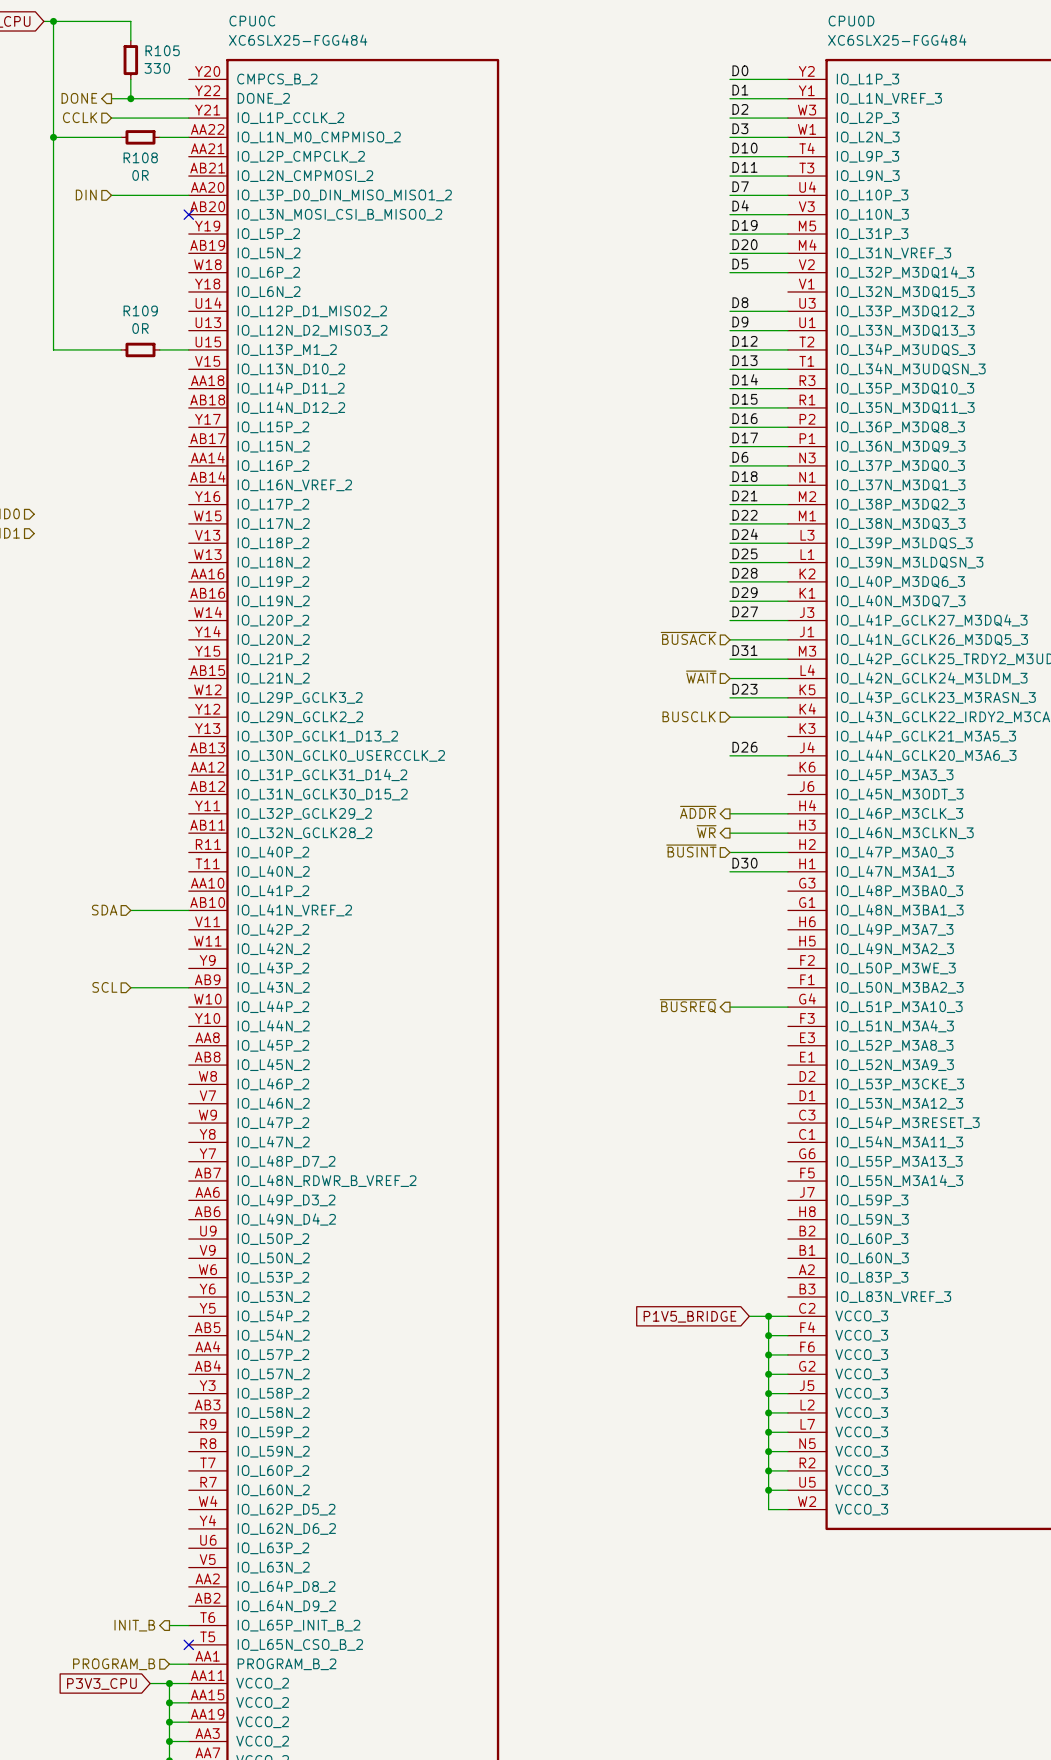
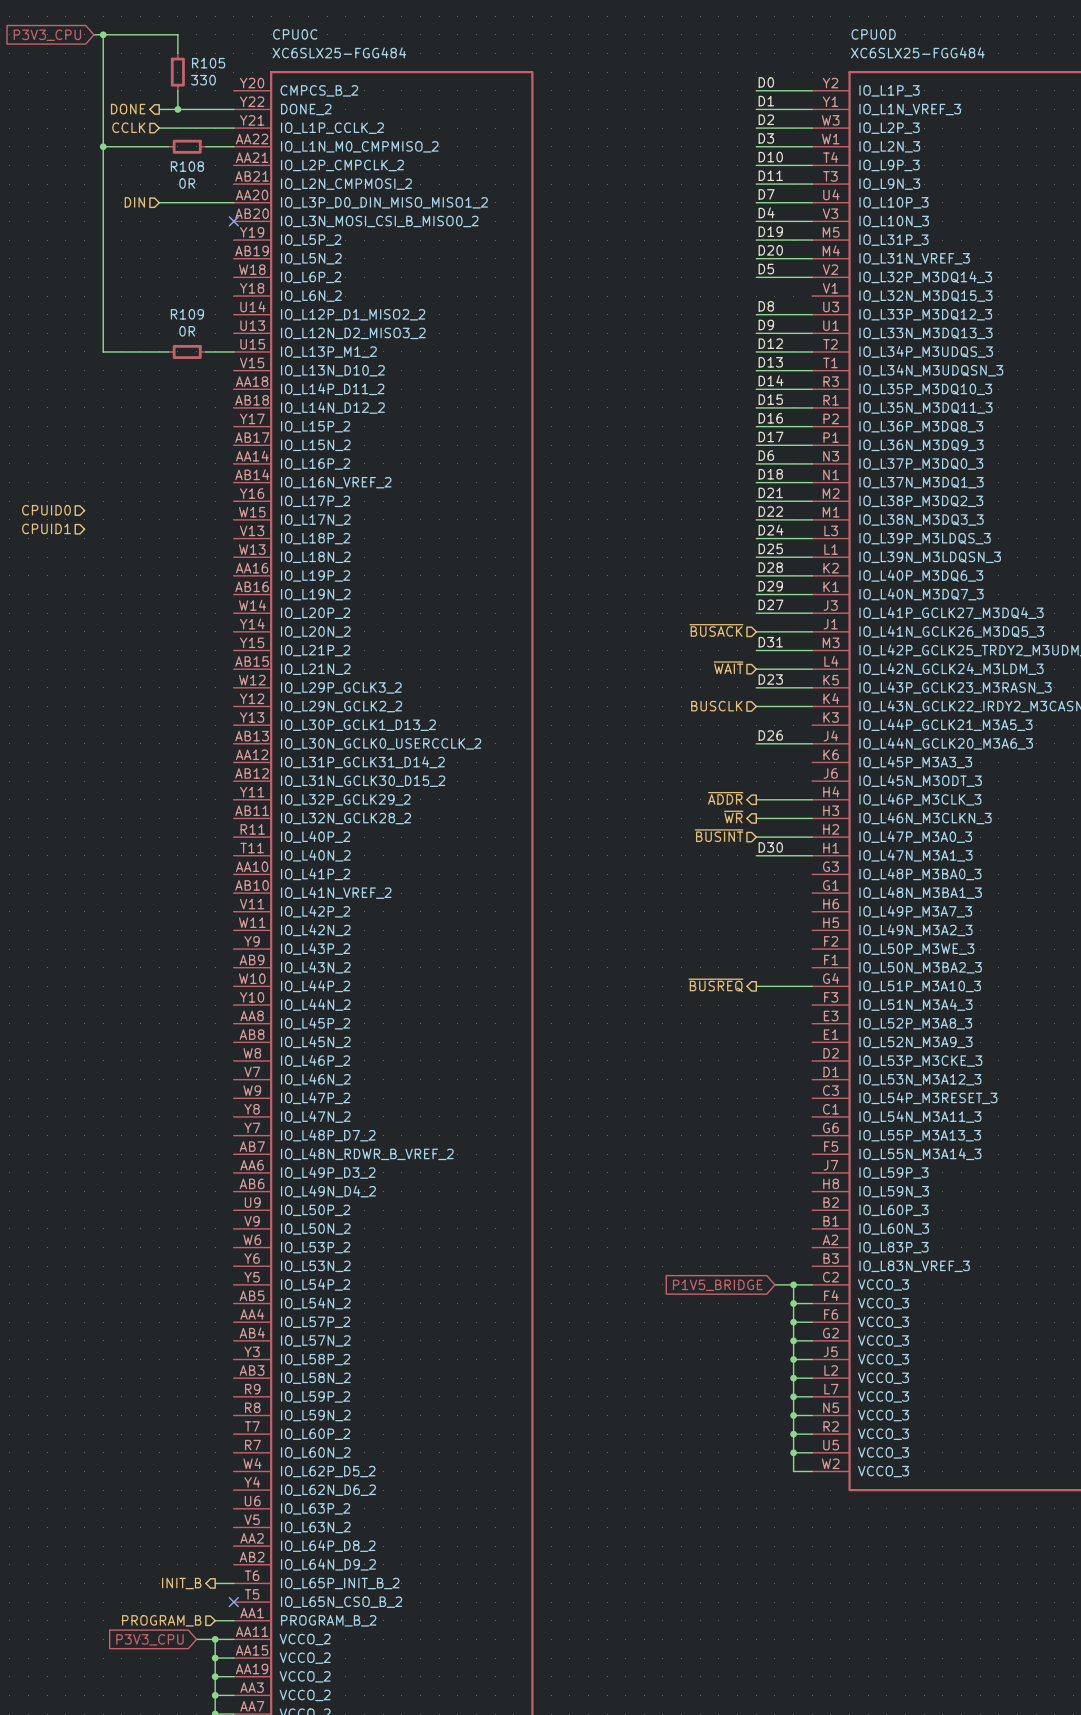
hierarchical label: SDA (104, 910) -> none
wire: (130, 910) (188, 910) -> none
hierarchical label: SCL (104, 987) -> none
wire: (130, 987) (188, 987) -> none

